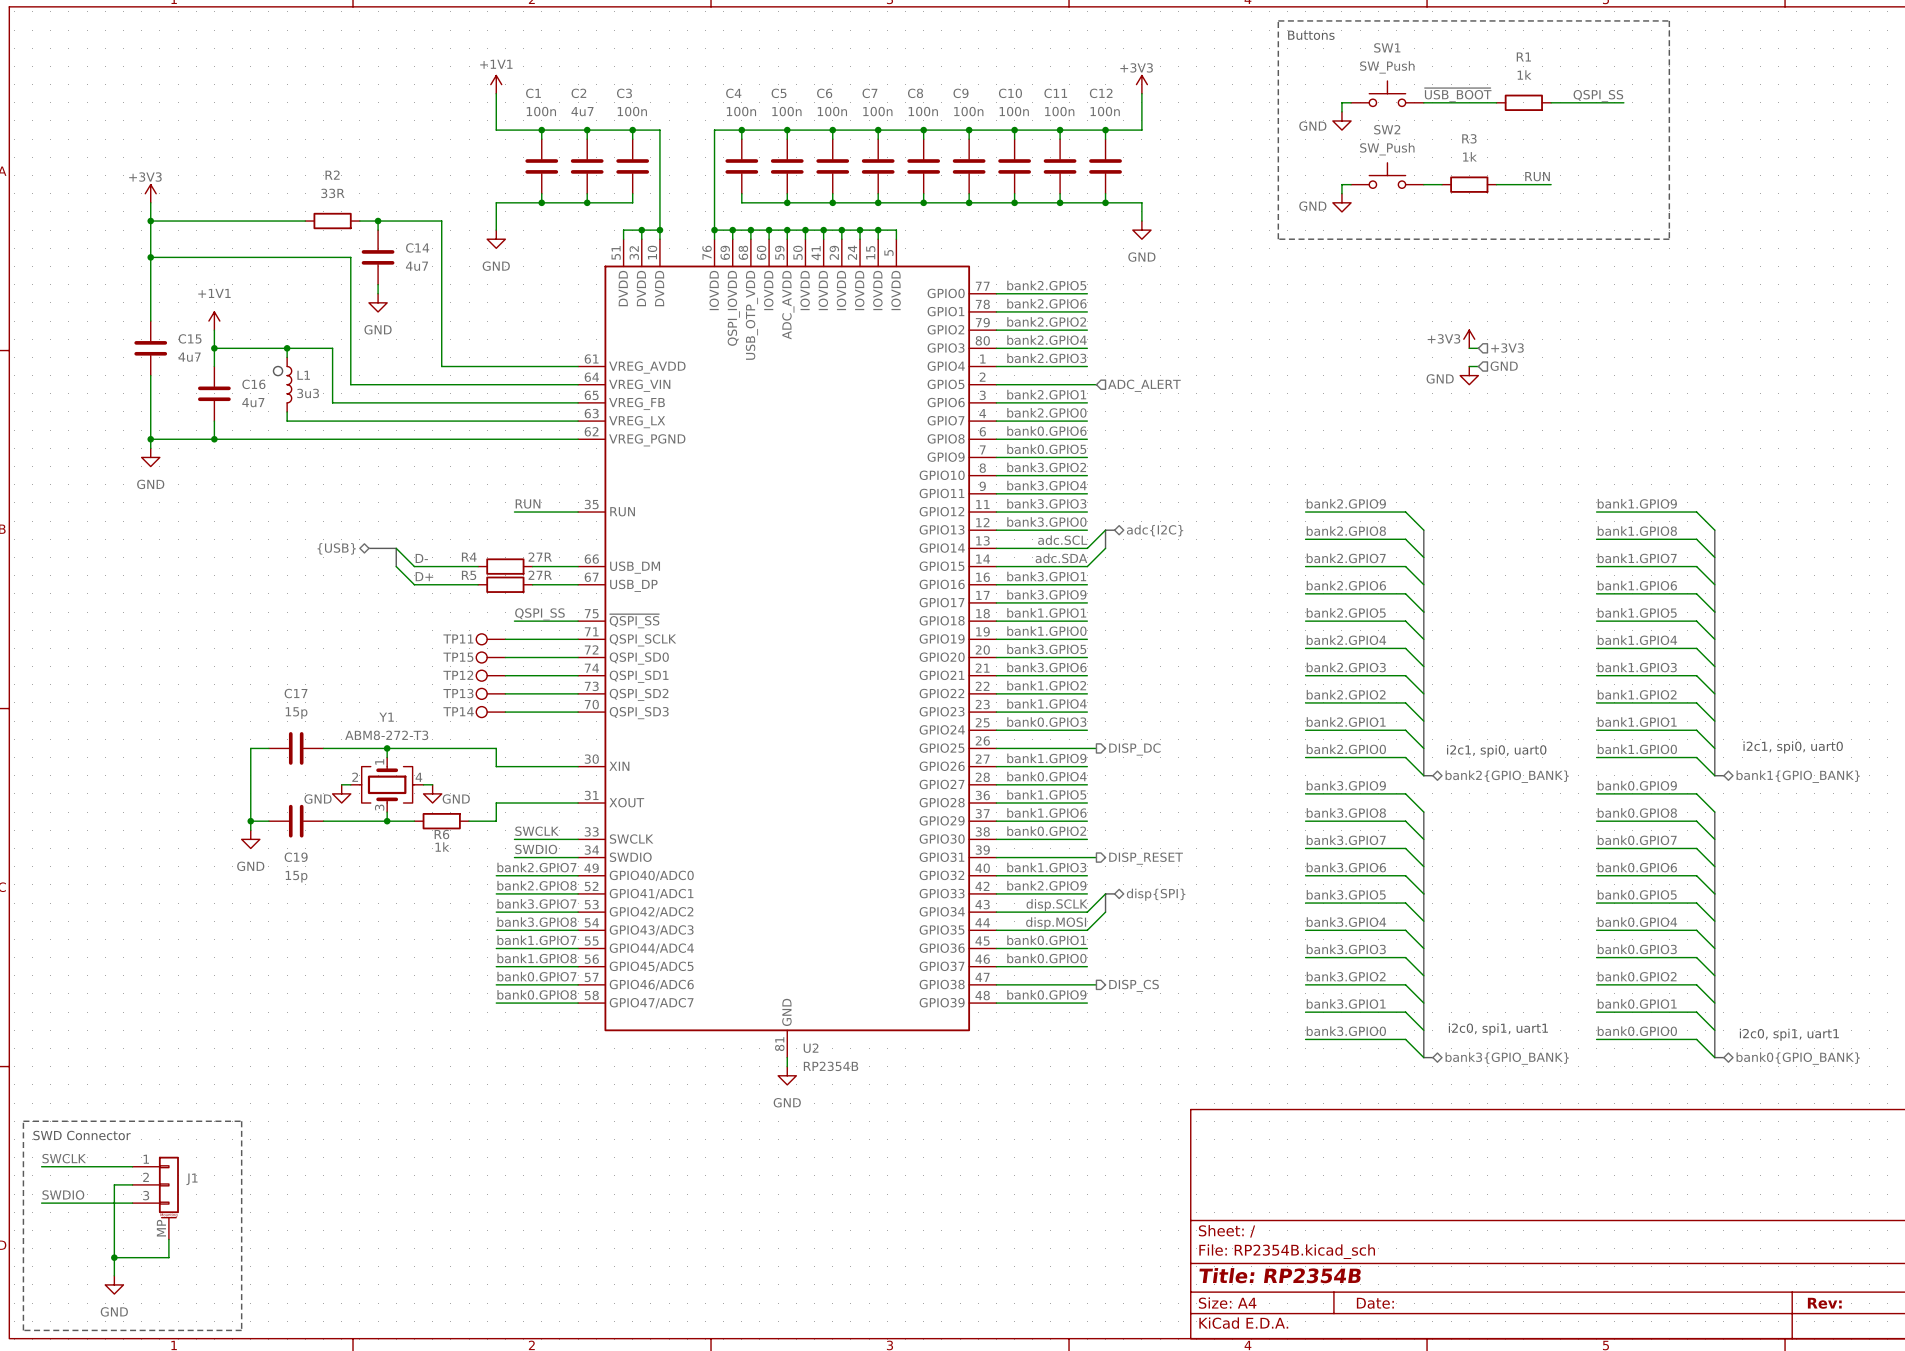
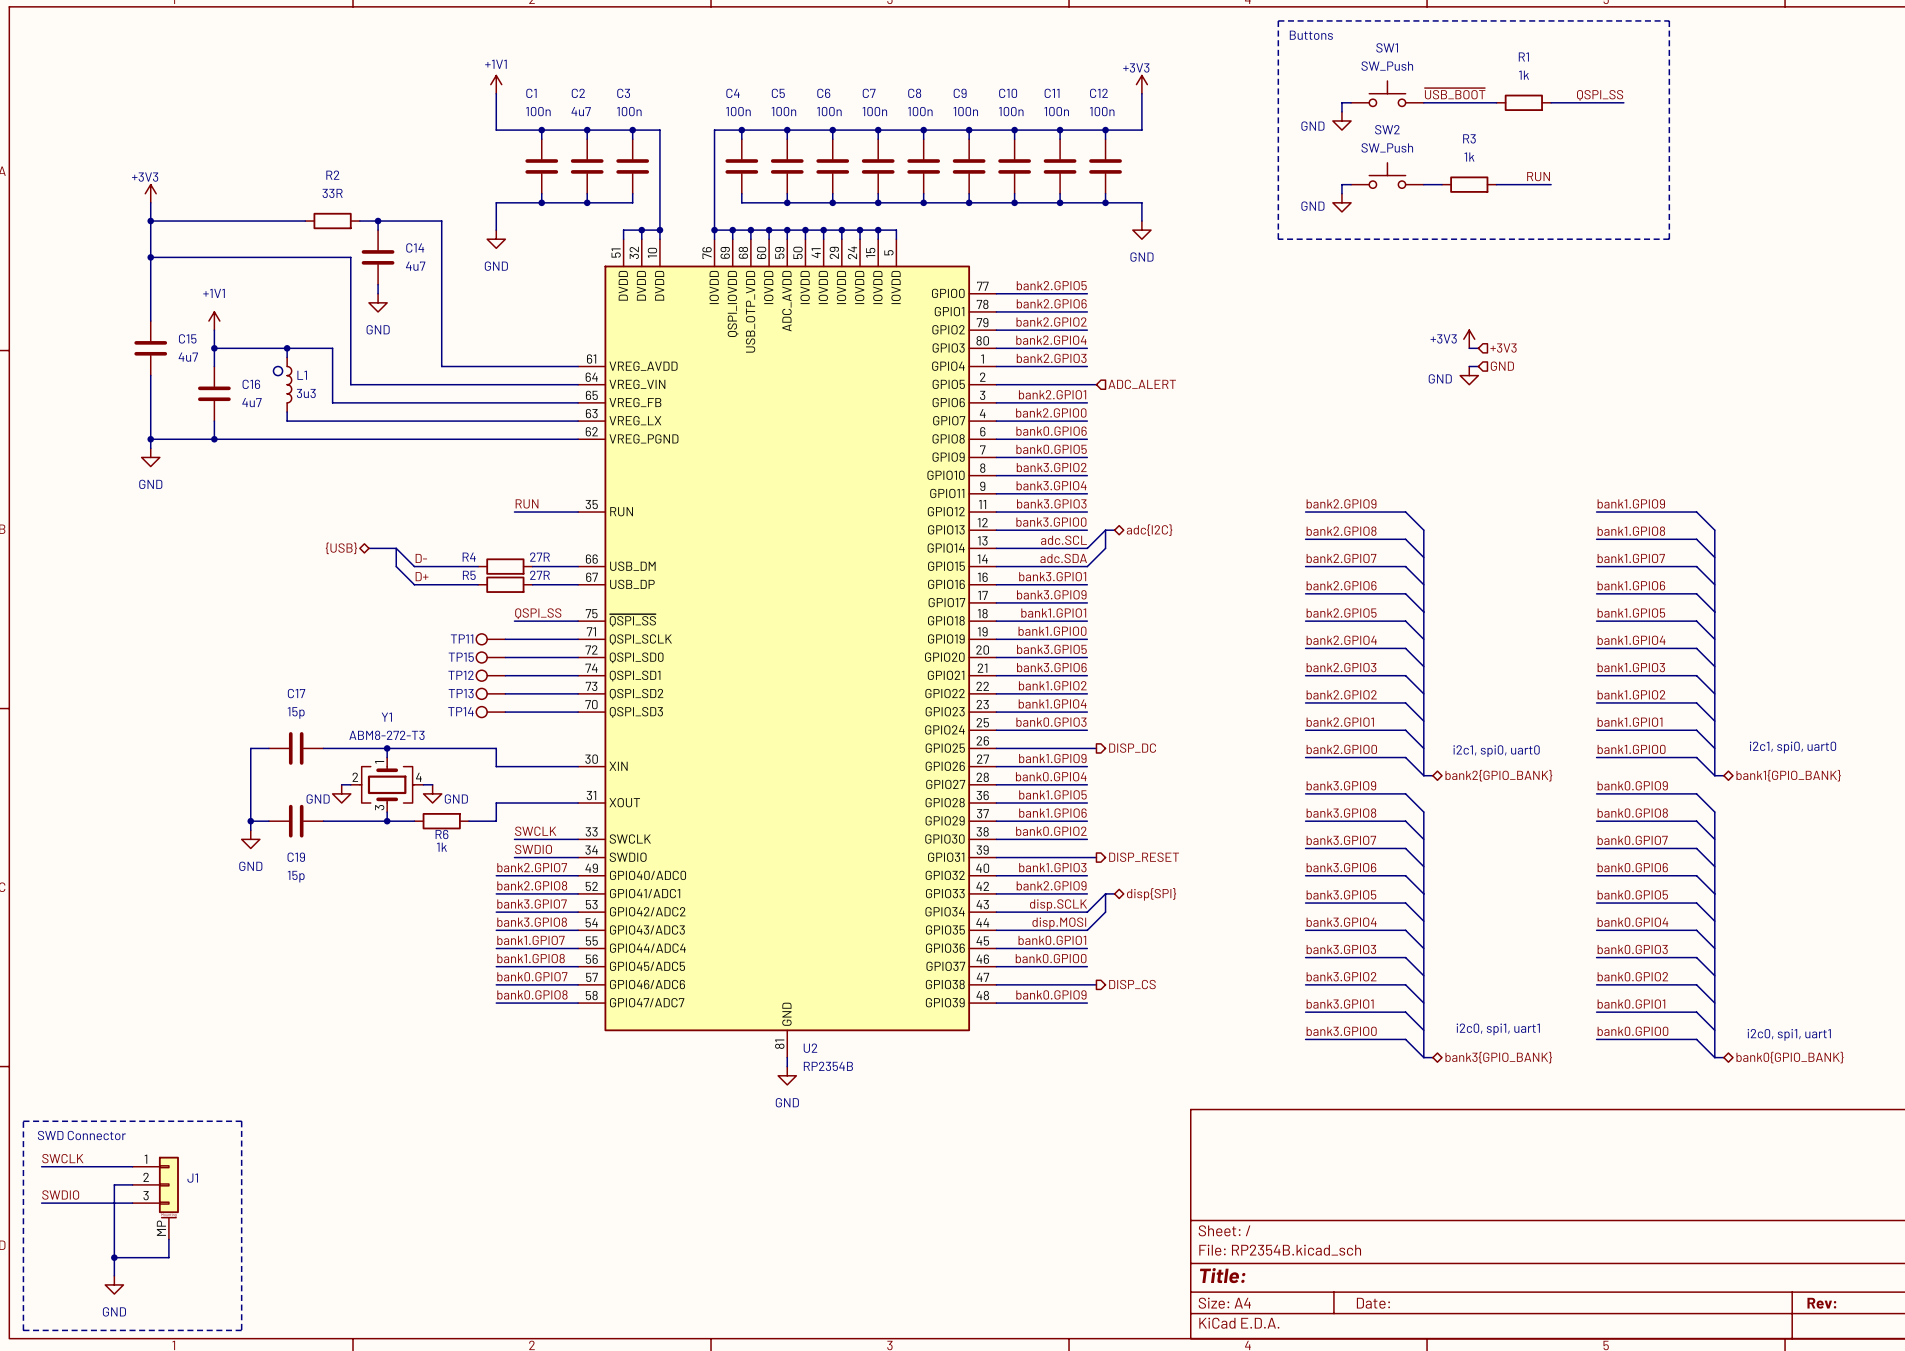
title block: Title: RP2354B (1280, 1275) -> Title: (1222, 1275)

